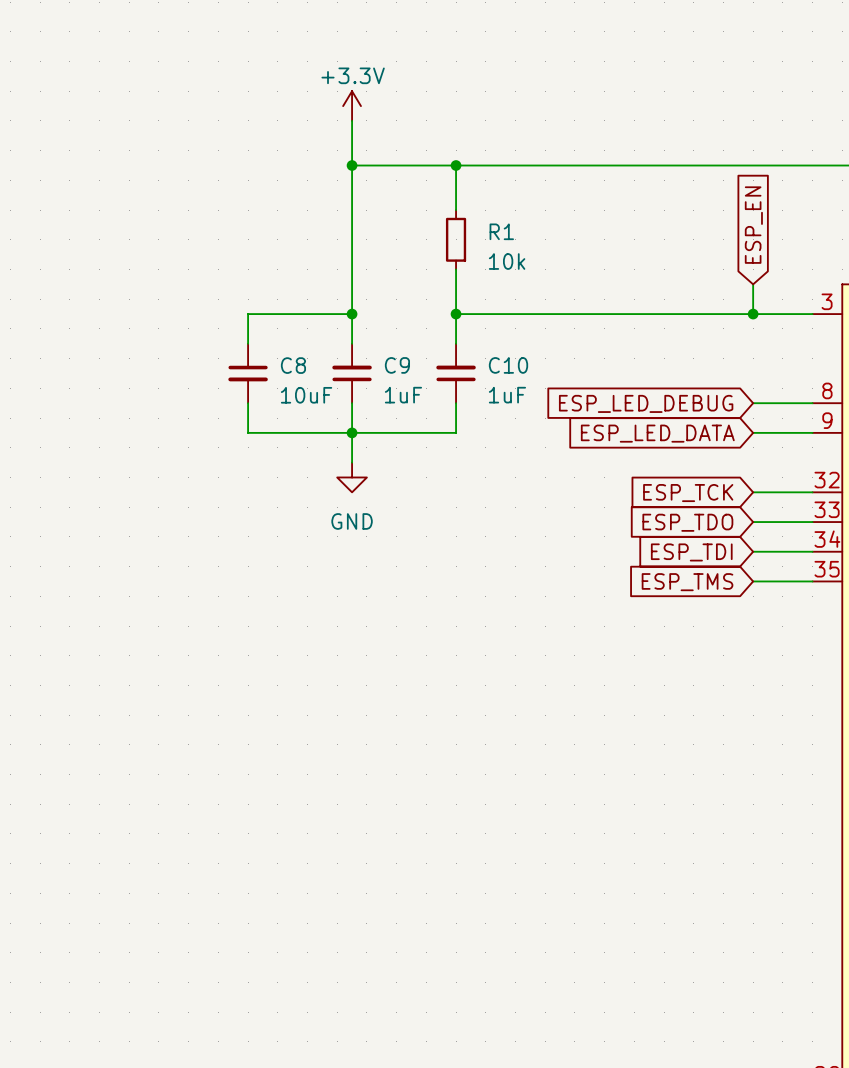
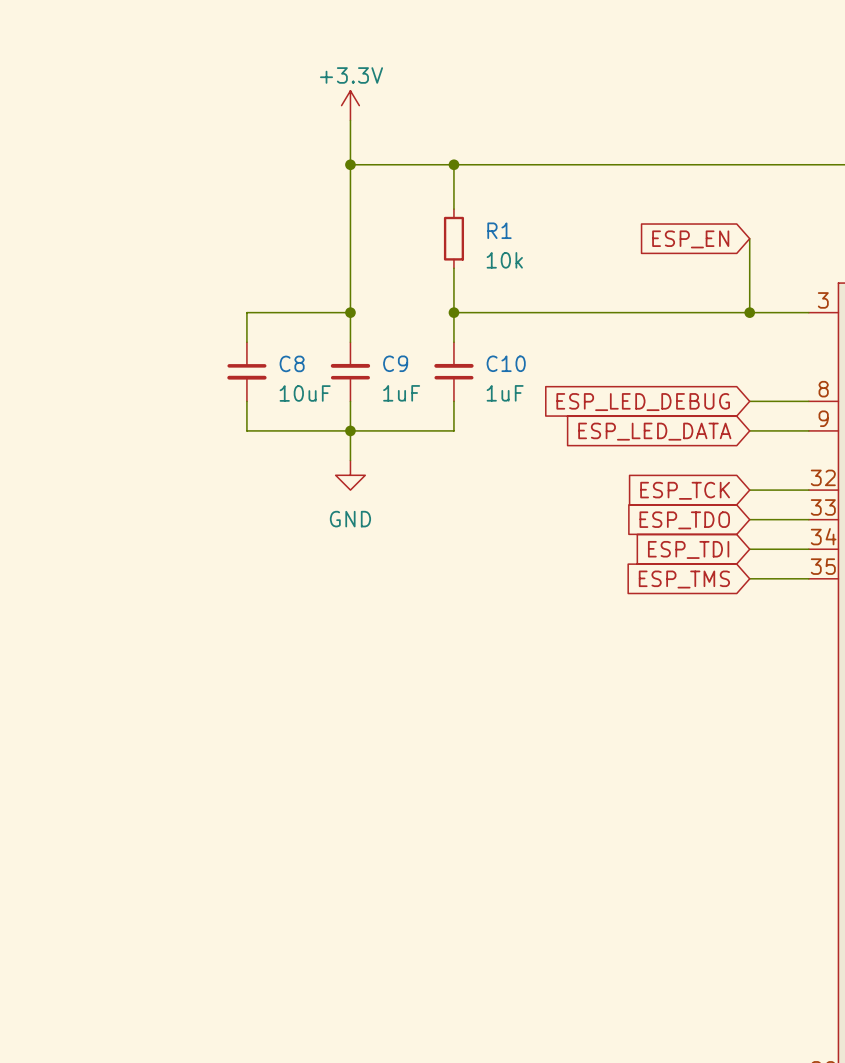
global label rotation: 0° (753, 225) -> 90° counterclockwise (690, 239)
wire: none -> (749, 238) (749, 283)

